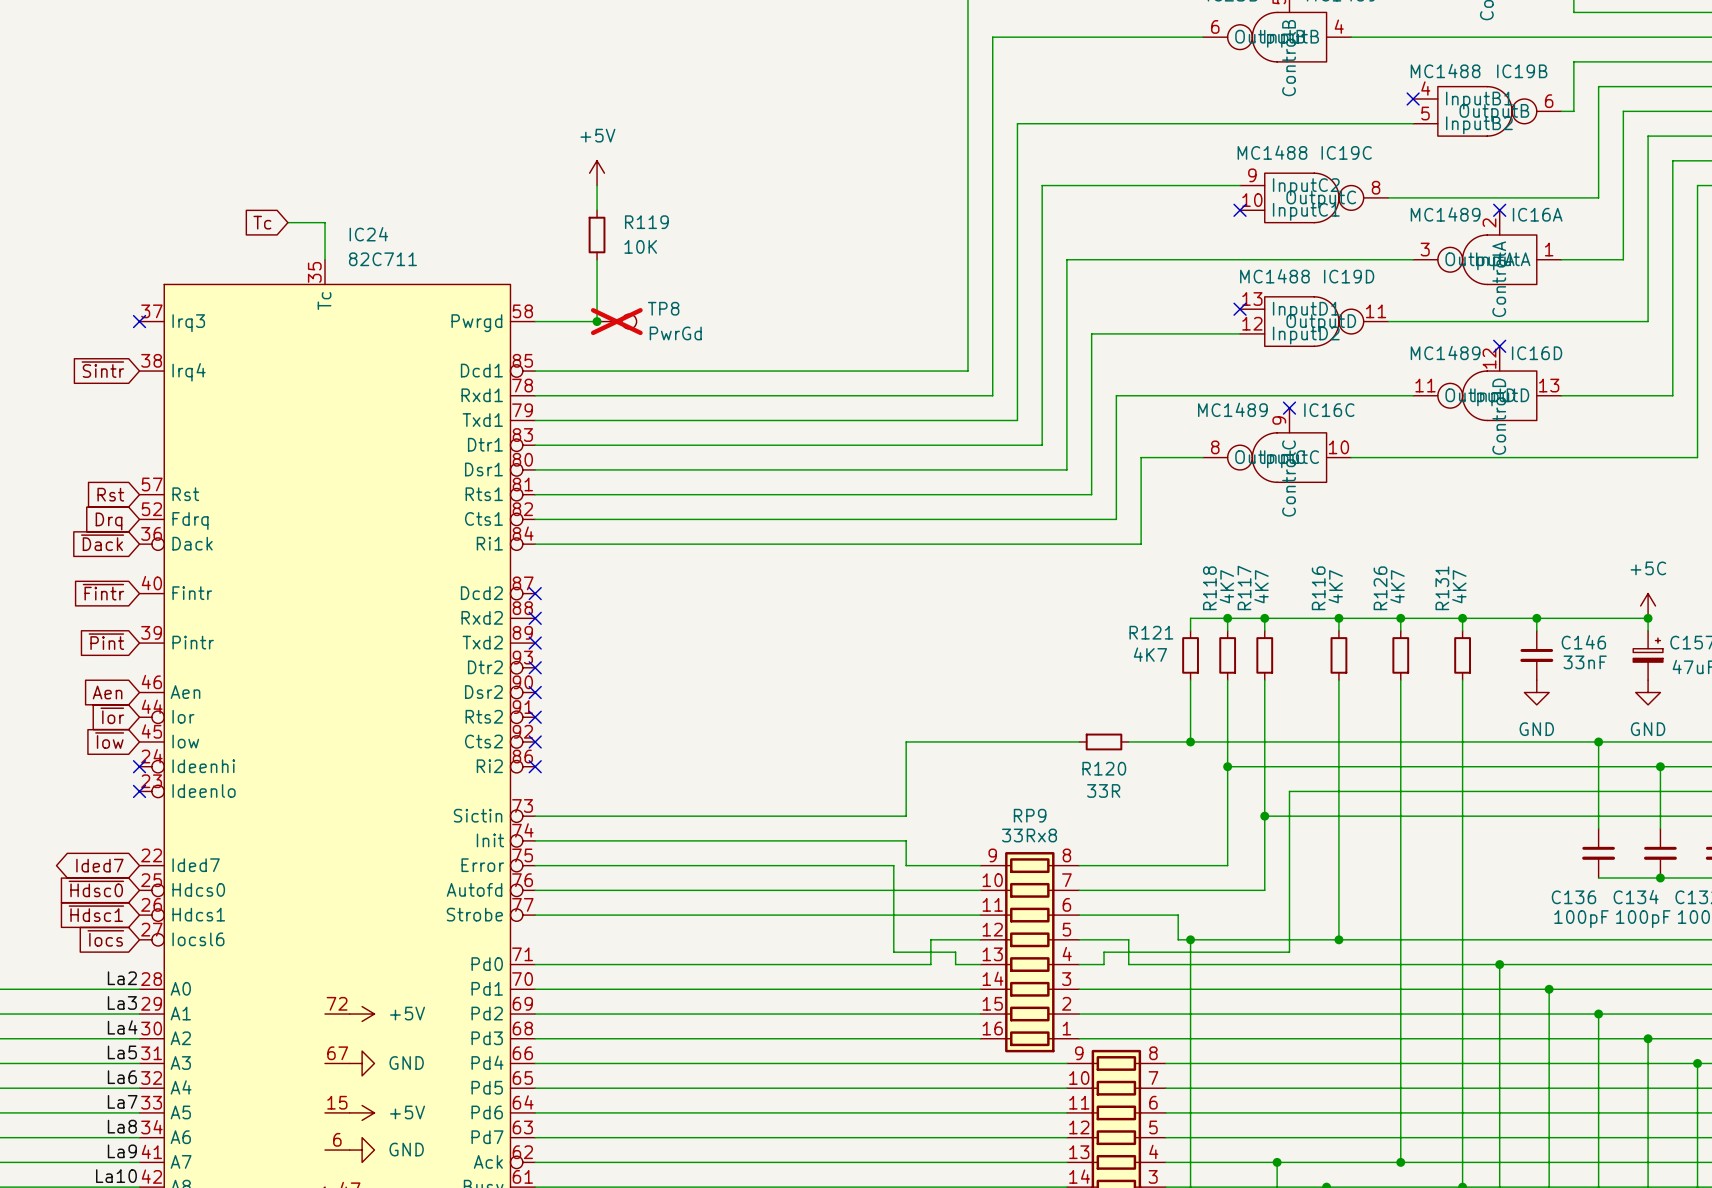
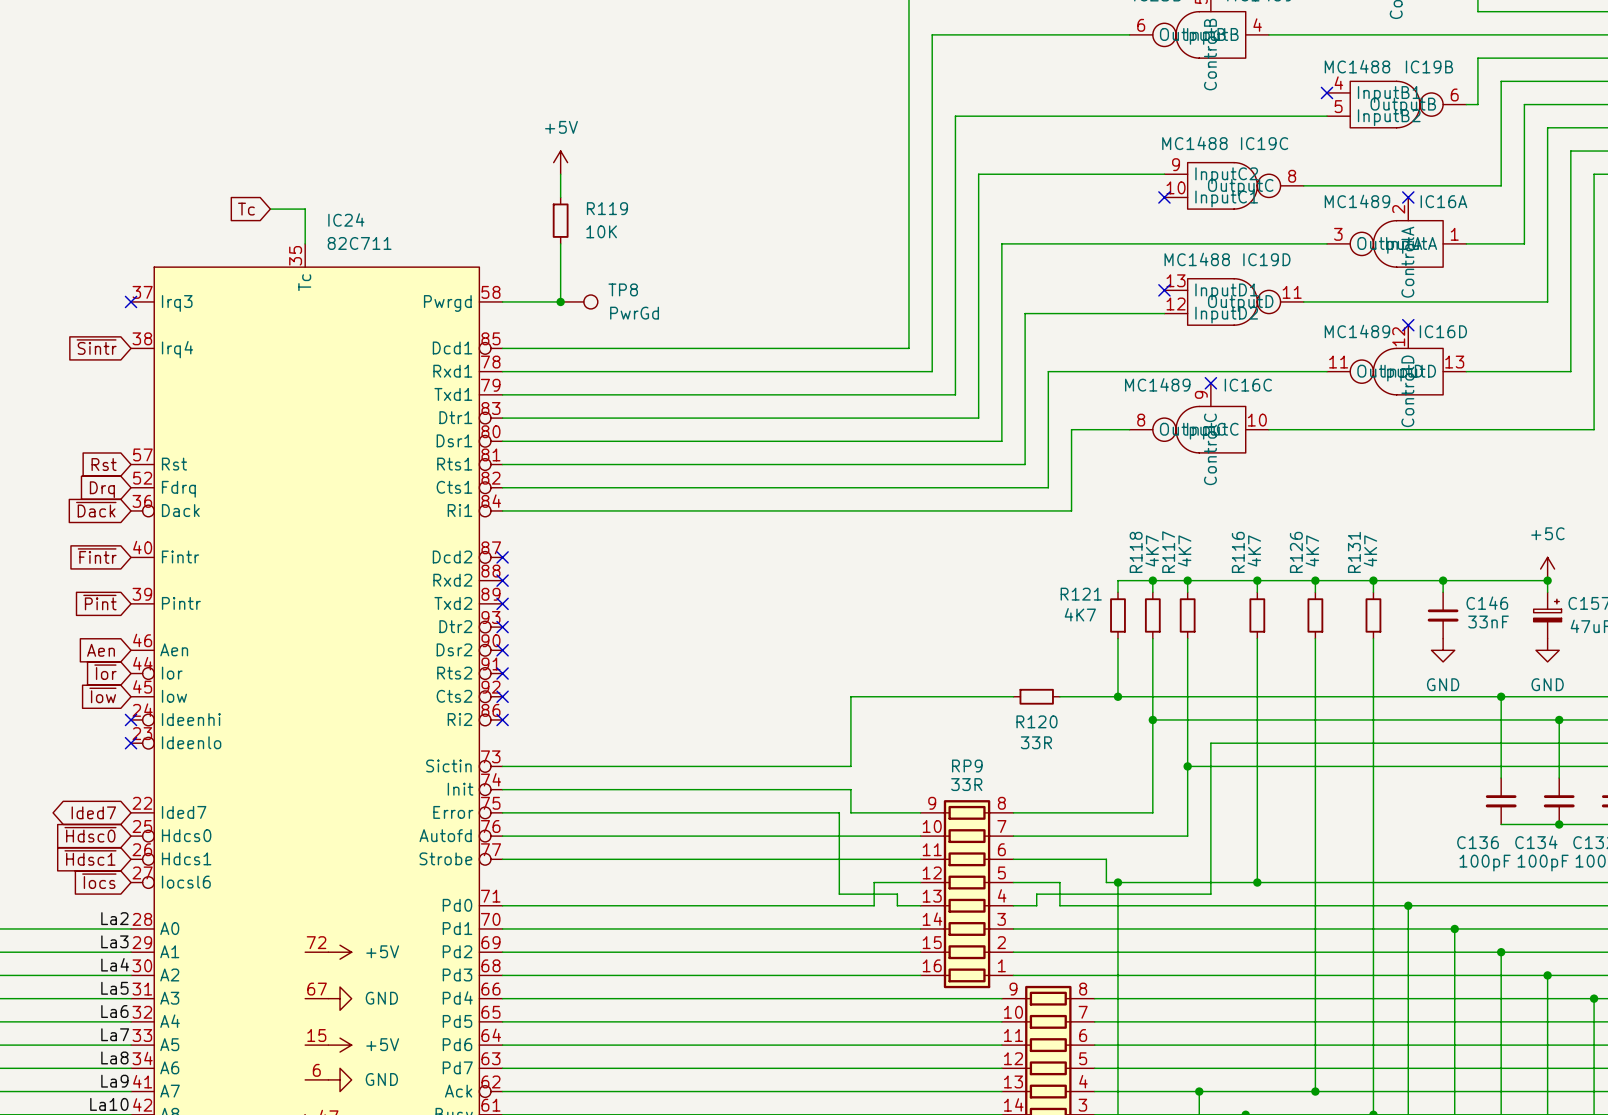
TP8 do-not-place cross: (616, 321) -> none
RP9 value: 33Rx8 (1029, 835) -> 33R (966, 784)

